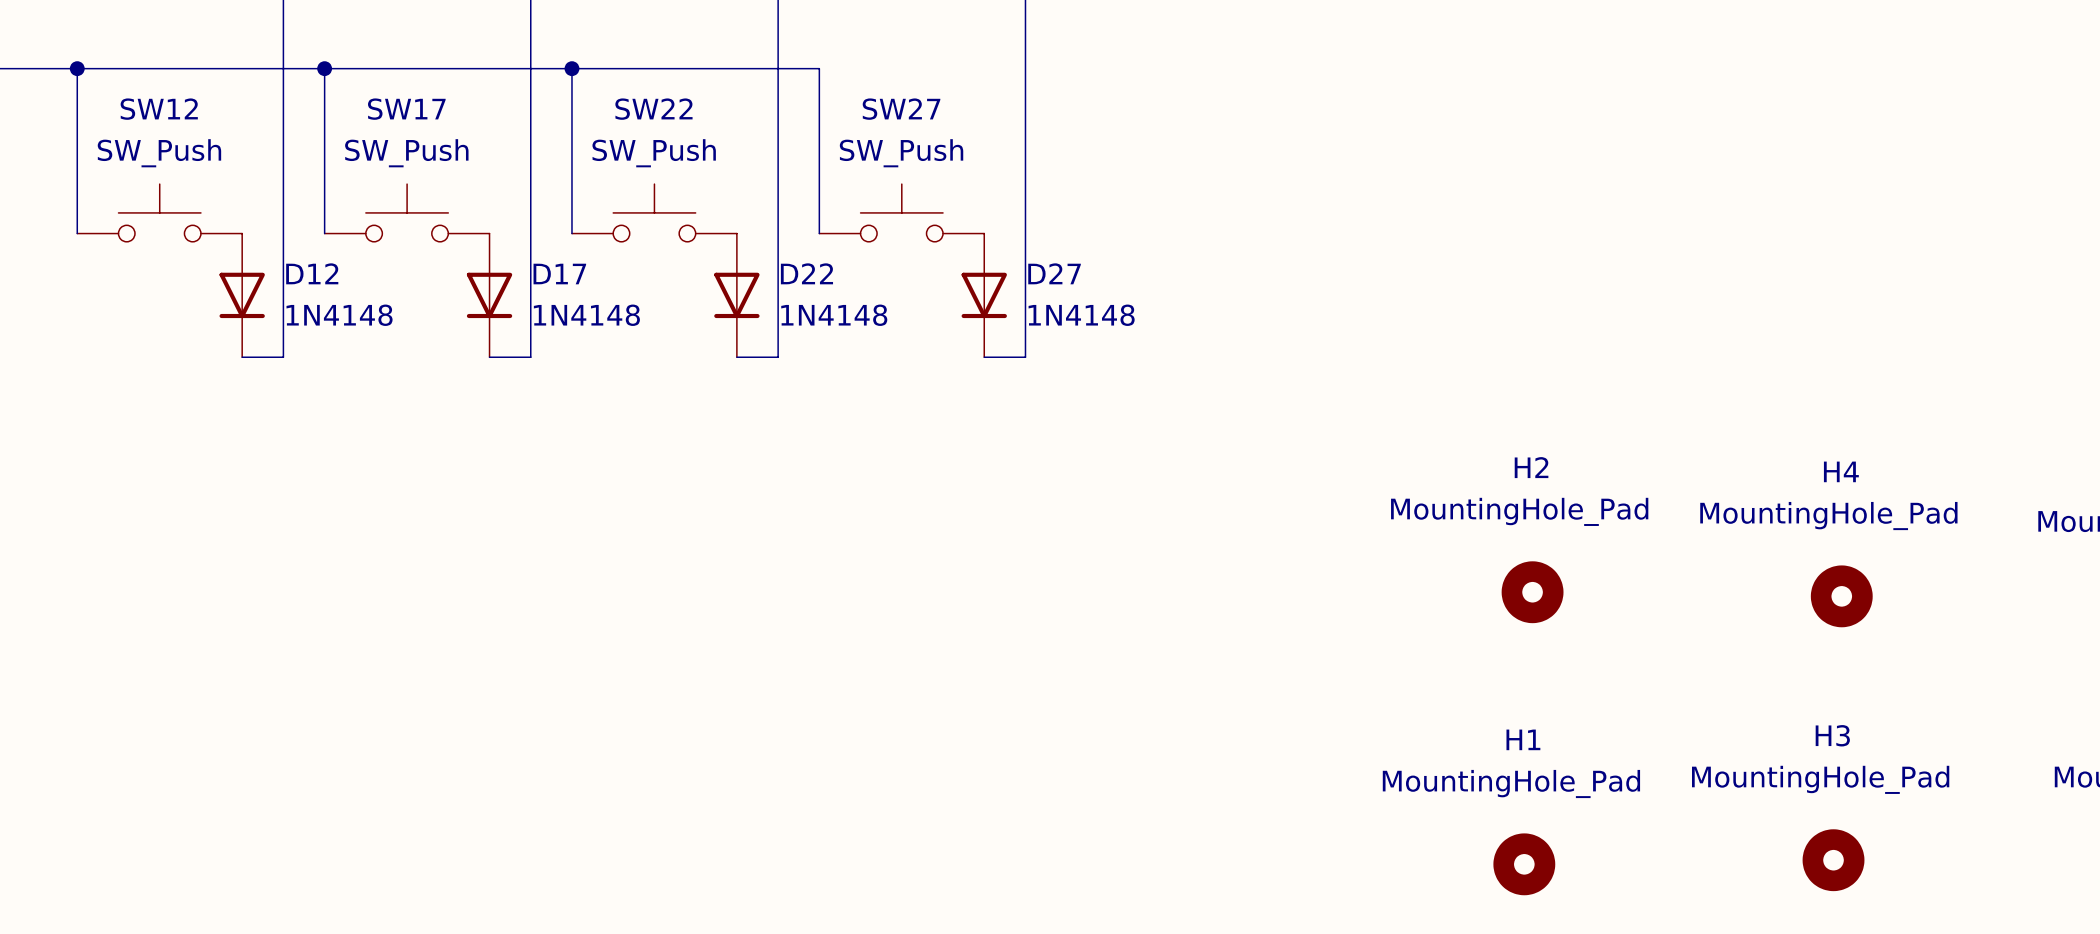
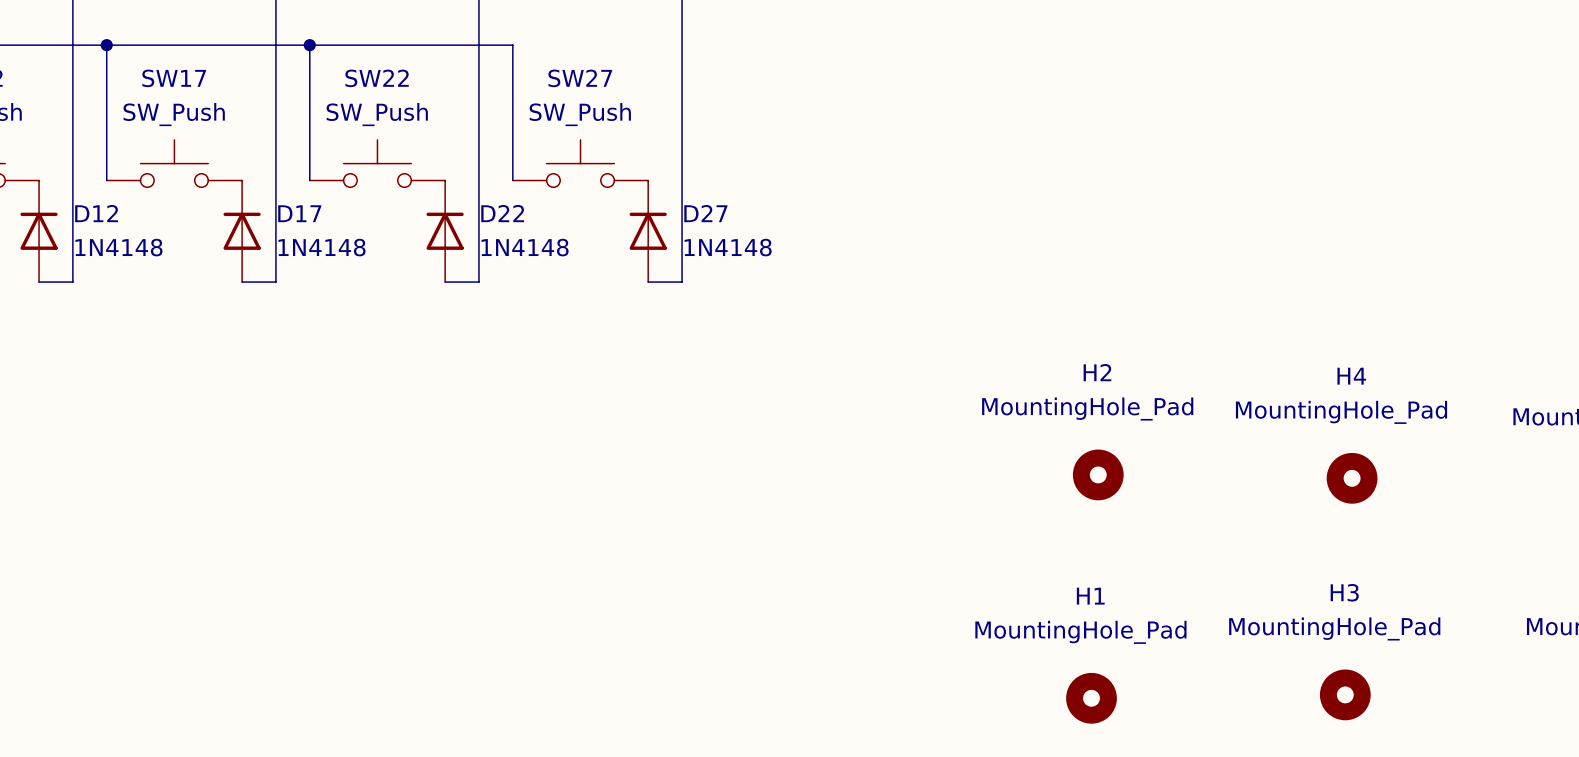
D12 rotation: 0° (242, 295) -> 180° (39, 231)
D17 rotation: 0° (489, 295) -> 180° (242, 231)
D22 rotation: 0° (736, 295) -> 180° (445, 231)
D27 rotation: 0° (984, 295) -> 180° (648, 231)

